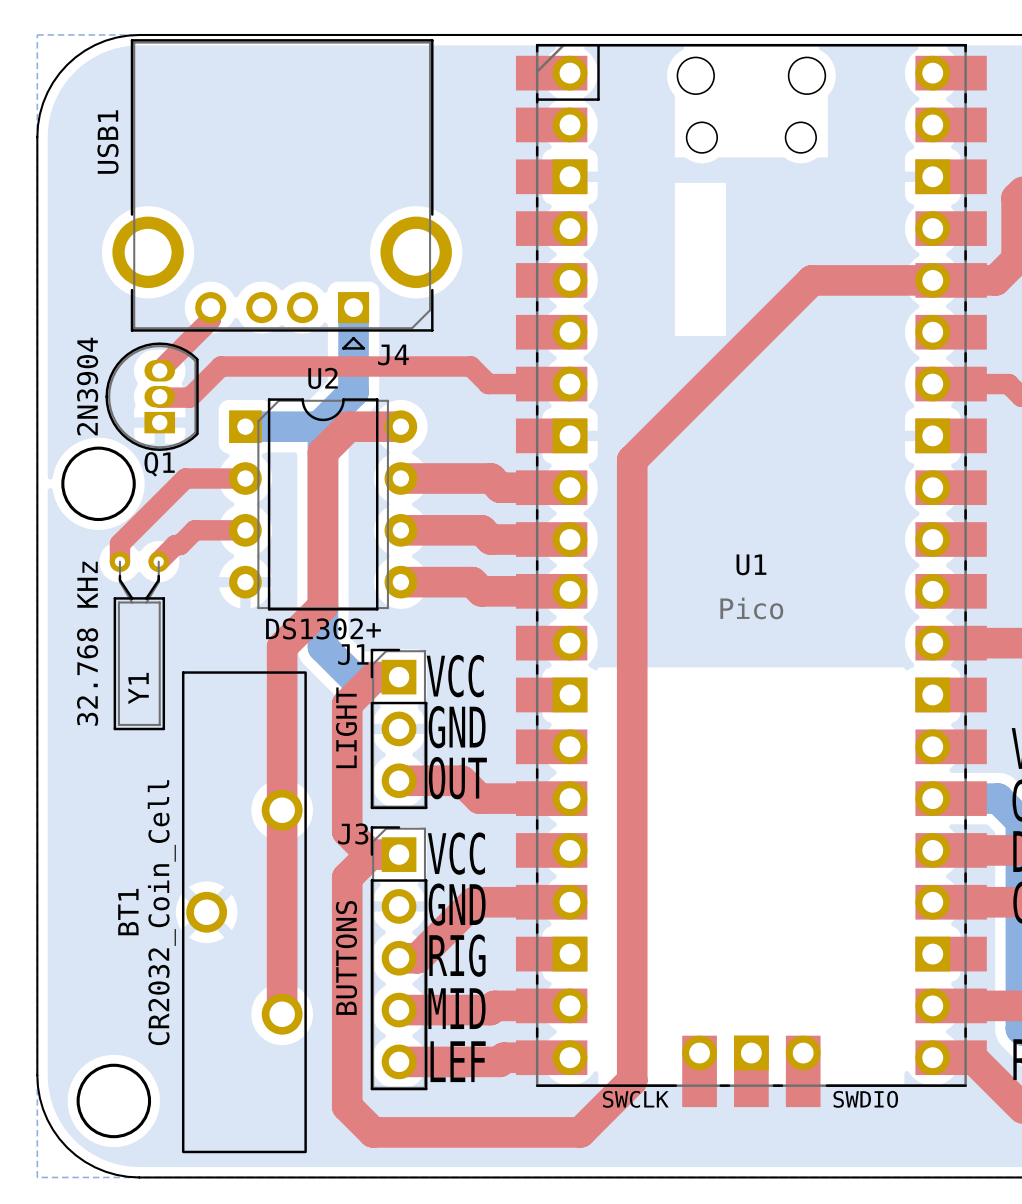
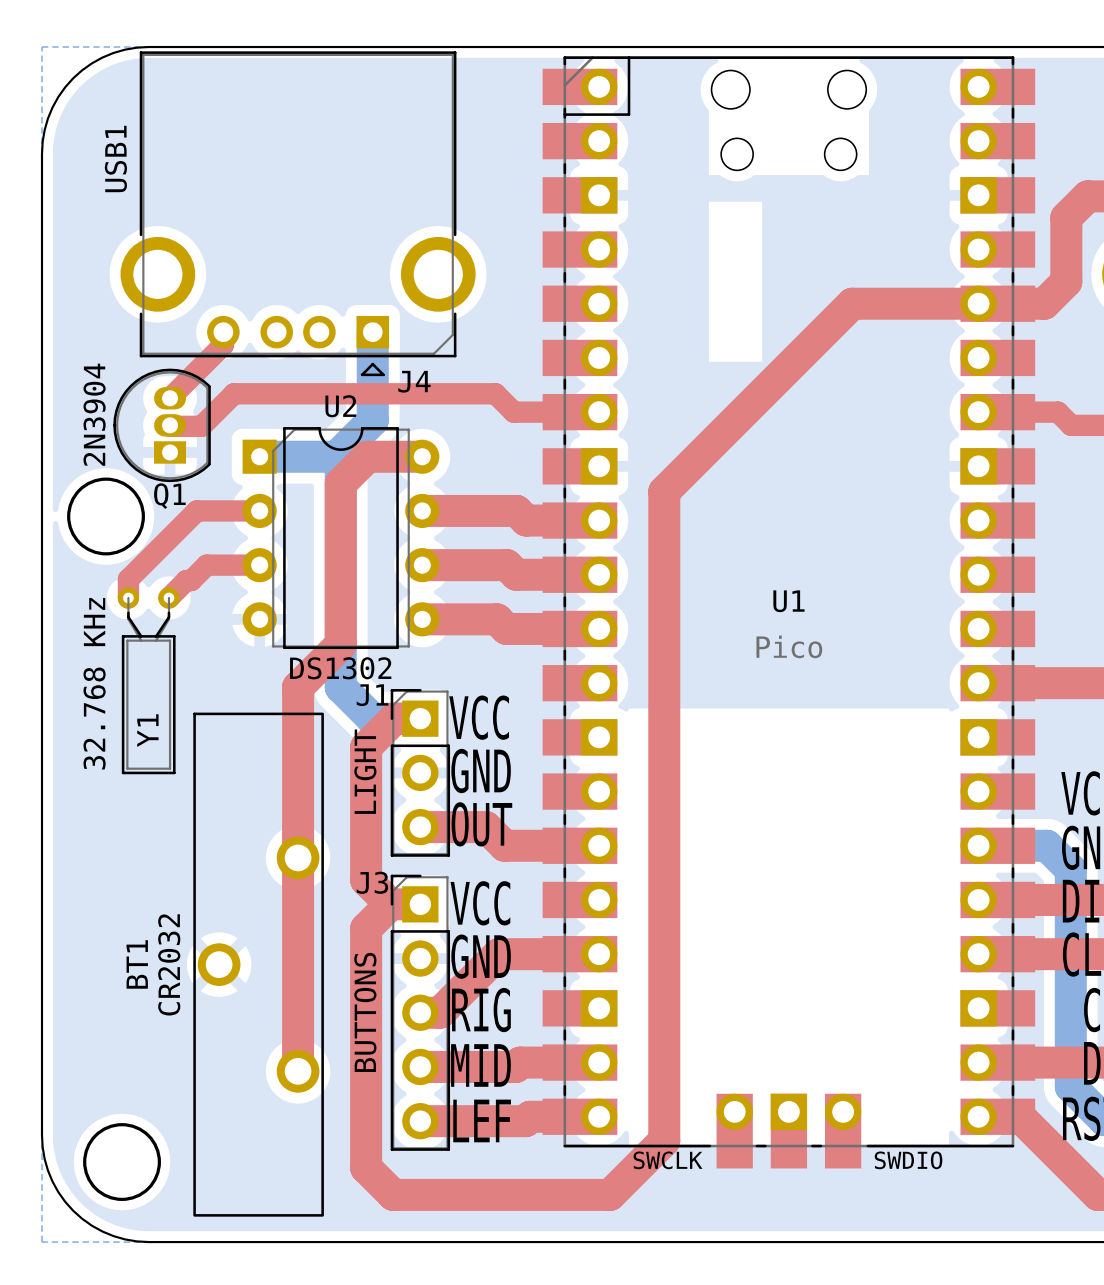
U2 value: DS1302+ (323, 628) -> DS1302 (340, 668)
BT1 value: CR2032_Coin_Cell (161, 912) -> CR2032 (169, 964)

